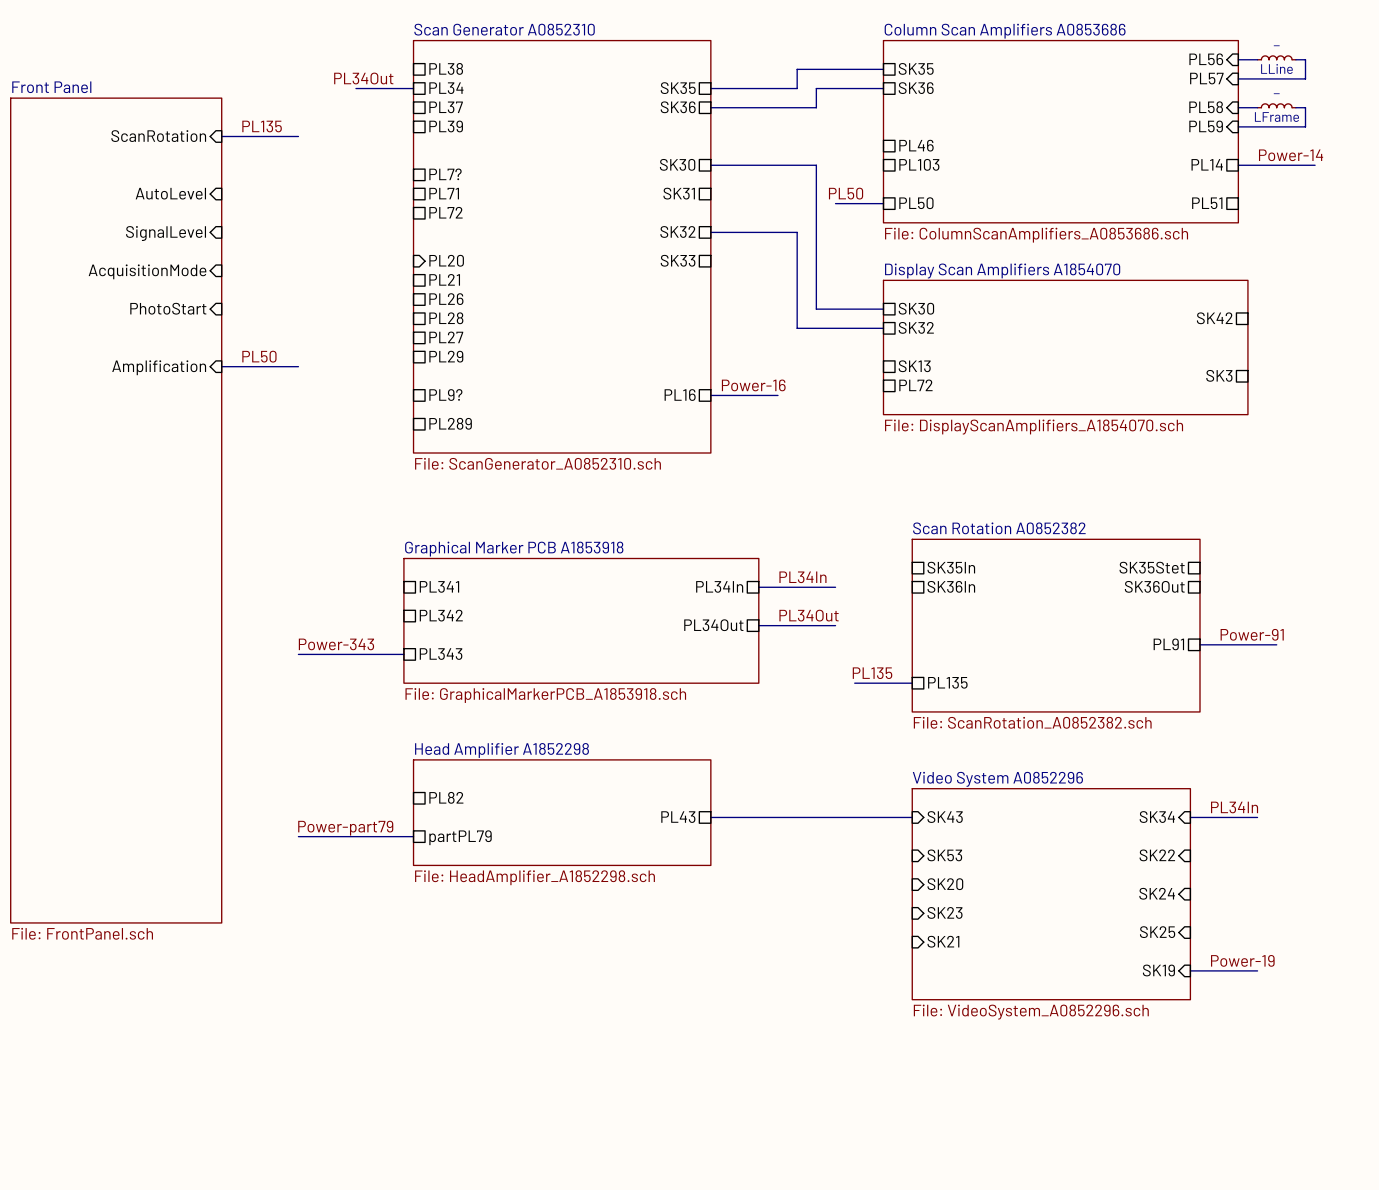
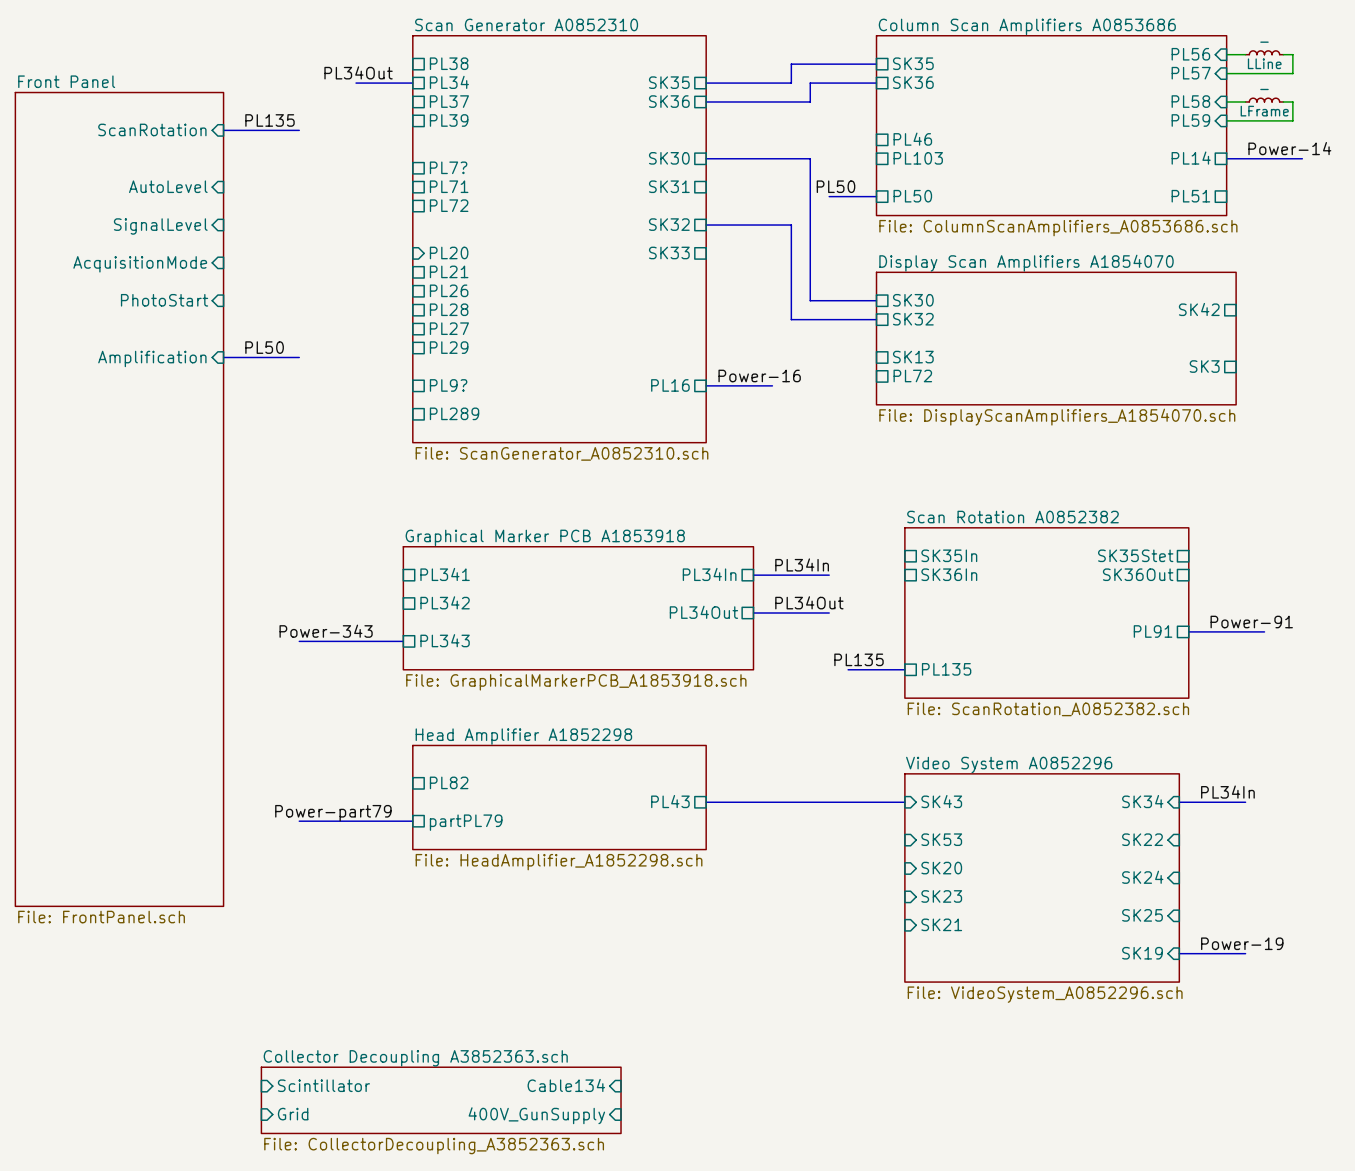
sheet pin: none -> Scintillator (323, 1085)
sheet pin: none -> Cable134 (566, 1085)
sheet Collector Decoupling A3852363.sch: none -> File: CollectorDecoupling_A3852363.sch (441, 1100)
sheet pin: none -> Grid (293, 1114)
sheet pin: none -> 400V_GunSupply (536, 1115)

